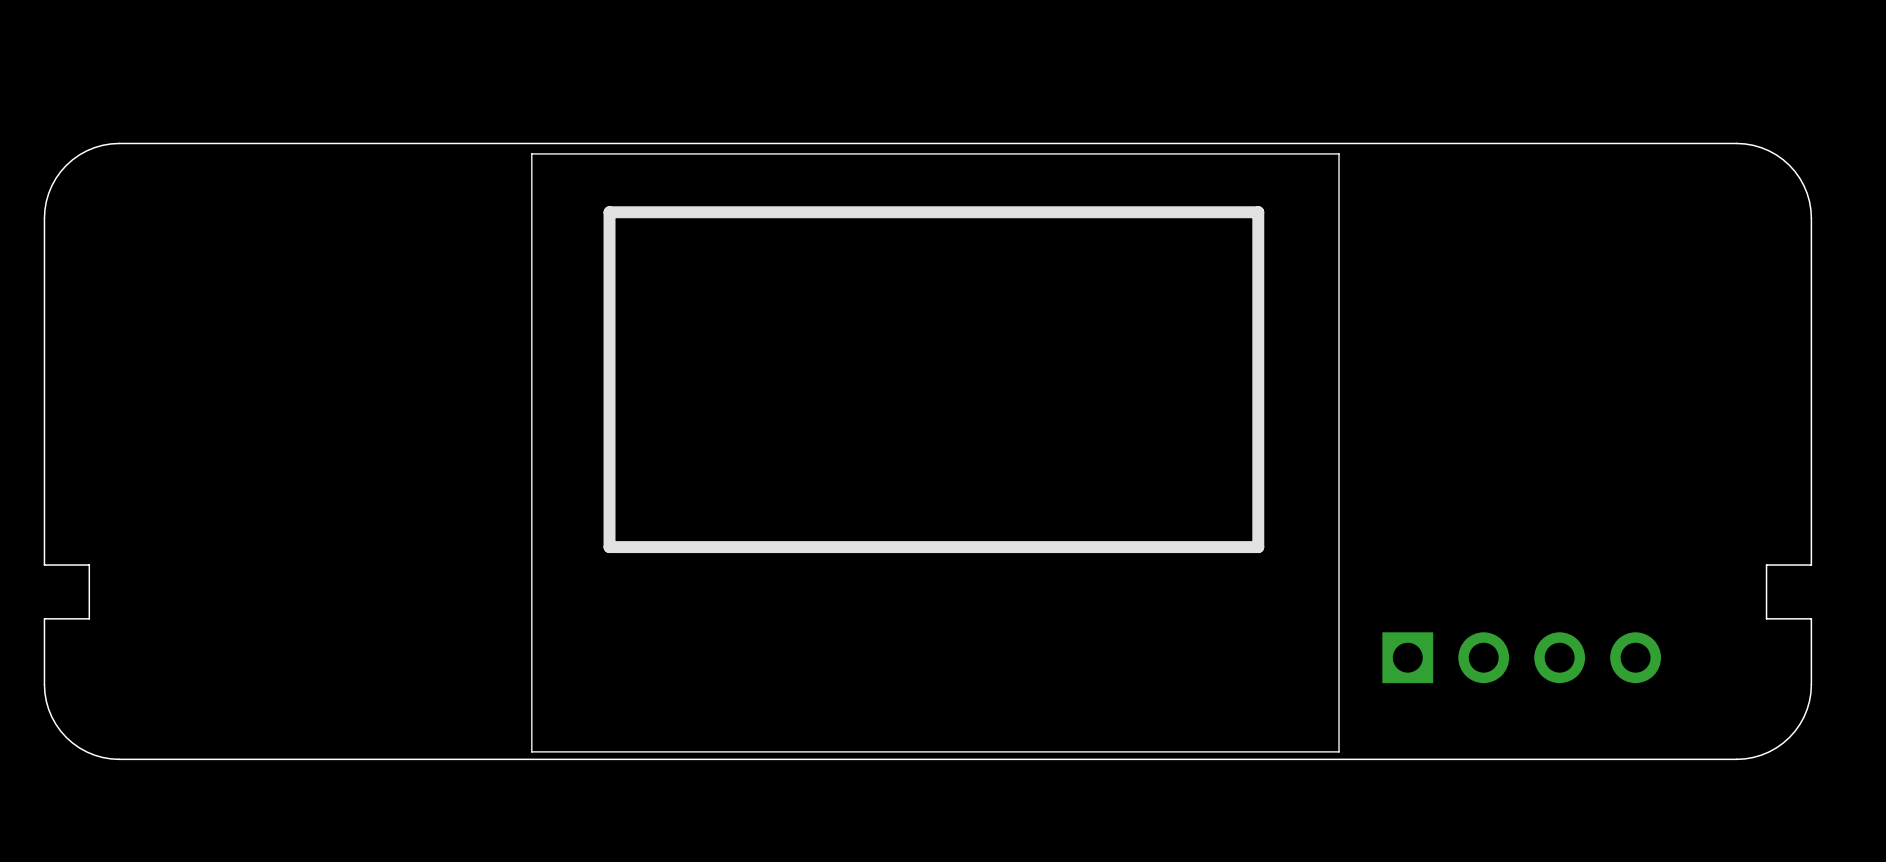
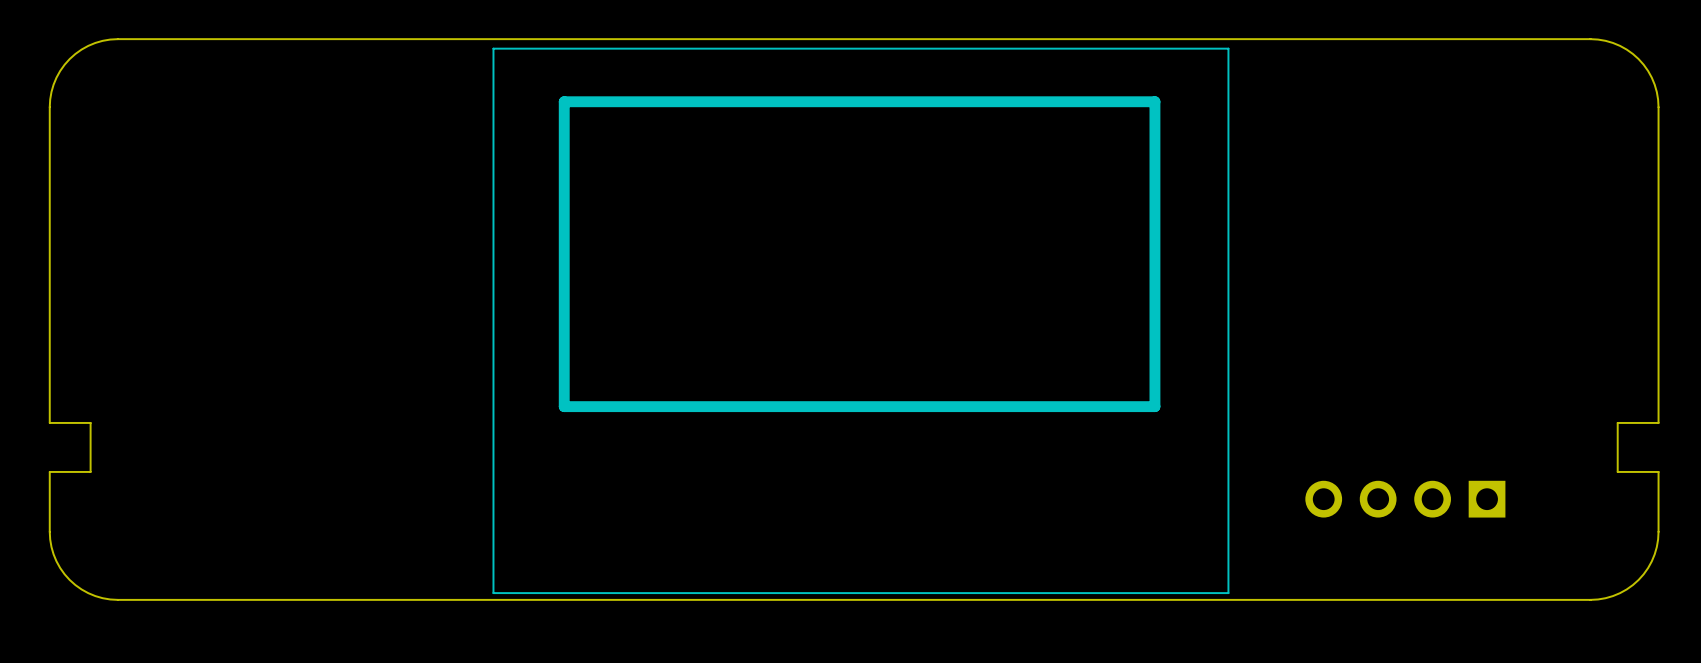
part footprint: [1382, 632, 1662, 684] -> [1305, 480, 1506, 518]

